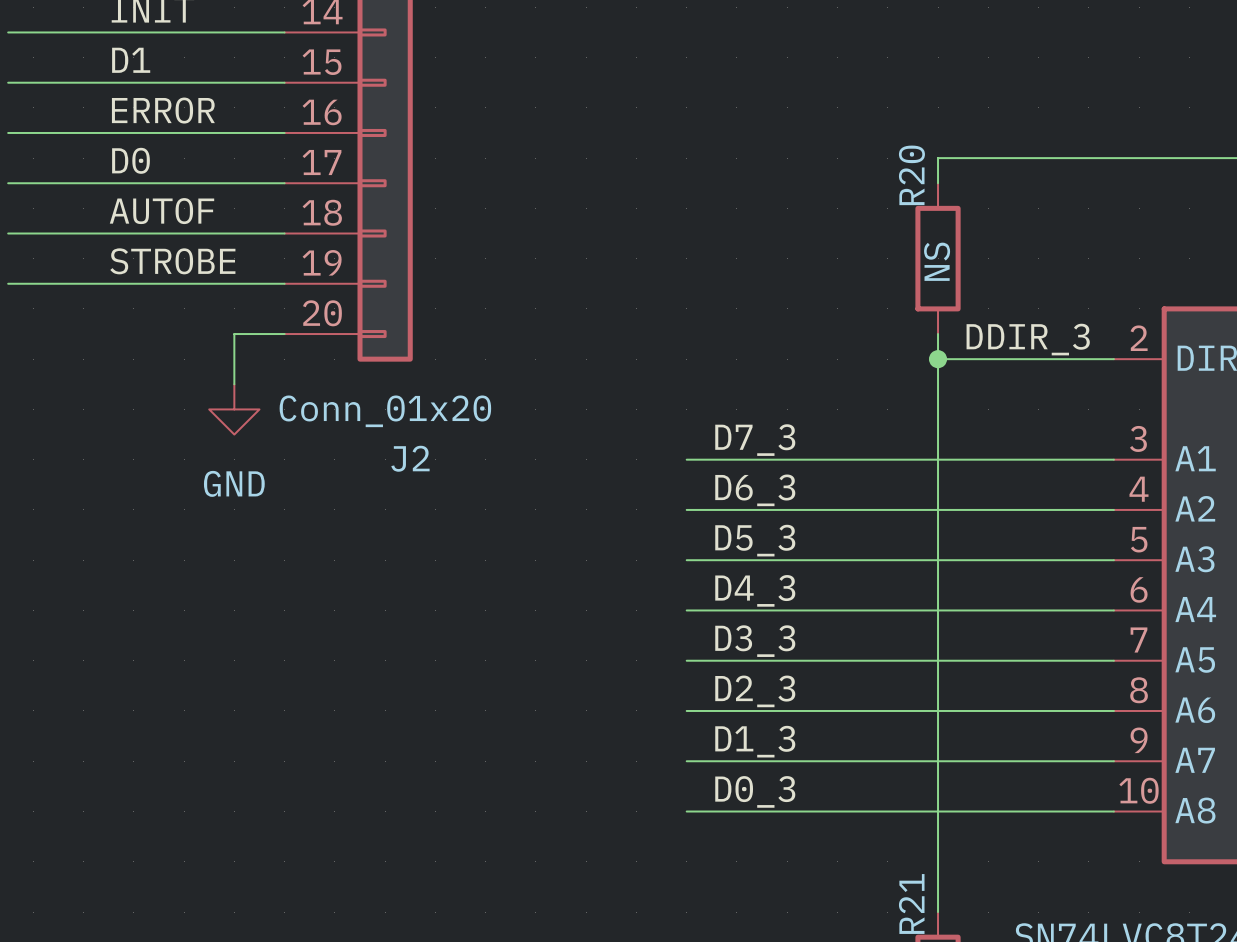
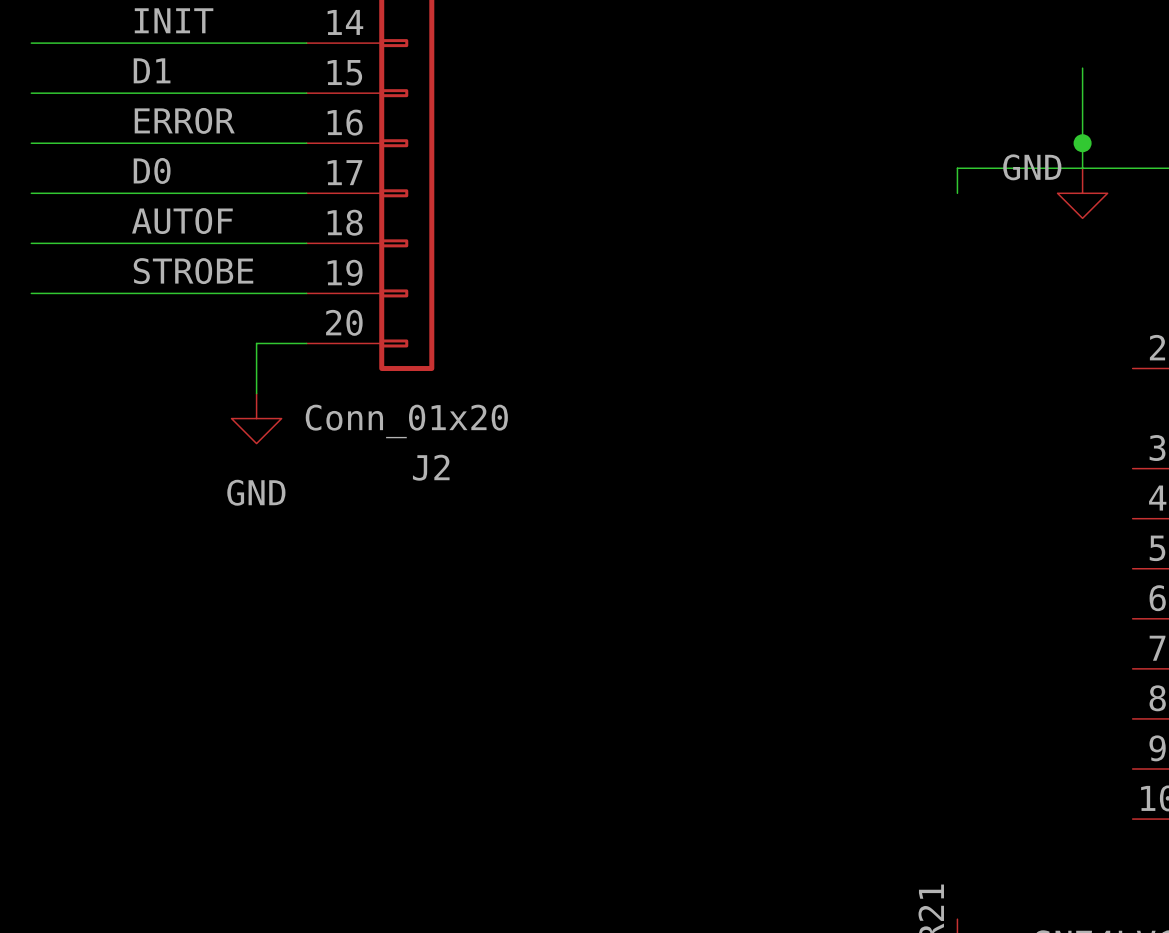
wire: none -> (1082, 68) (1082, 168)
junction: none -> (1082, 143)
power symbol: none -> GND (1082, 193)
R20: NS (938, 258) -> none
wire: (938, 334) (938, 912) -> none
label: DDIR_3 (1028, 339) -> none
wire: (938, 359) (1113, 359) -> none
junction: (938, 359) -> none
label: D7_3 (755, 440) -> none
wire: (686, 459) (1113, 459) -> none
label: D6_3 (755, 490) -> none
wire: (686, 509) (1113, 509) -> none
label: D5_3 (755, 540) -> none
wire: (686, 560) (1113, 560) -> none
label: D4_3 (755, 590) -> none
wire: (686, 610) (1113, 610) -> none
label: D3_3 (755, 641) -> none
wire: (686, 660) (1113, 660) -> none
label: D2_3 (755, 691) -> none
wire: (686, 710) (1113, 710) -> none
label: D1_3 (755, 741) -> none
wire: (686, 761) (1113, 761) -> none
label: D0_3 (755, 791) -> none
wire: (686, 811) (1113, 811) -> none

